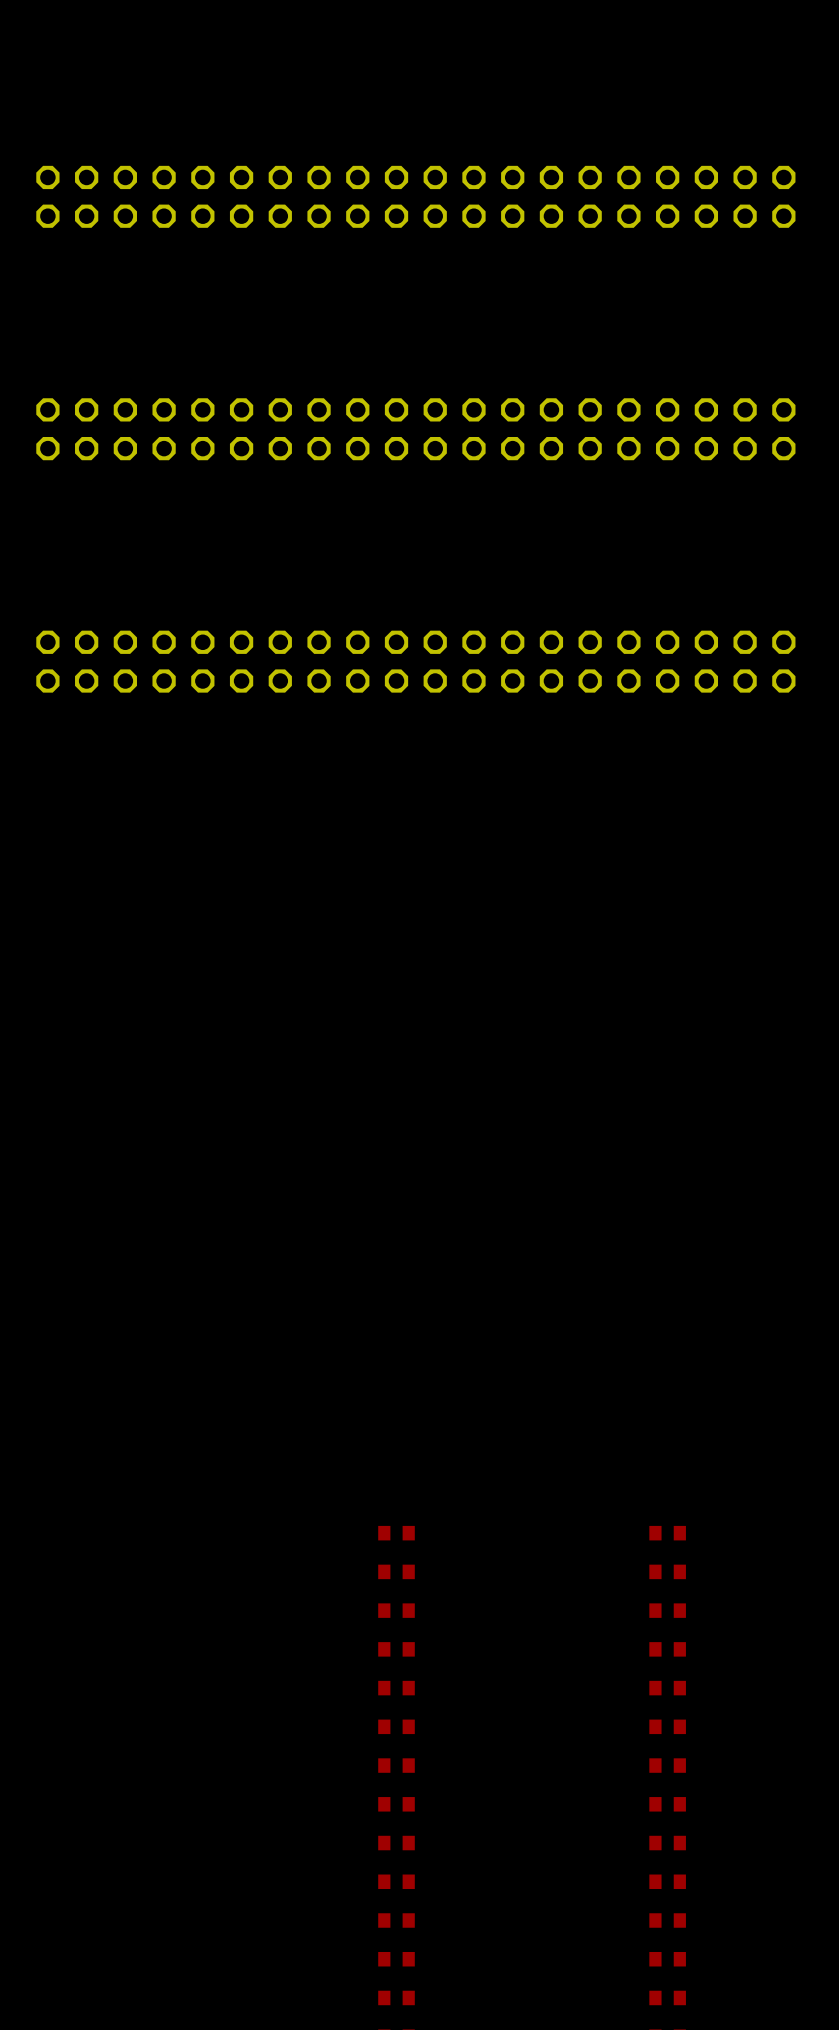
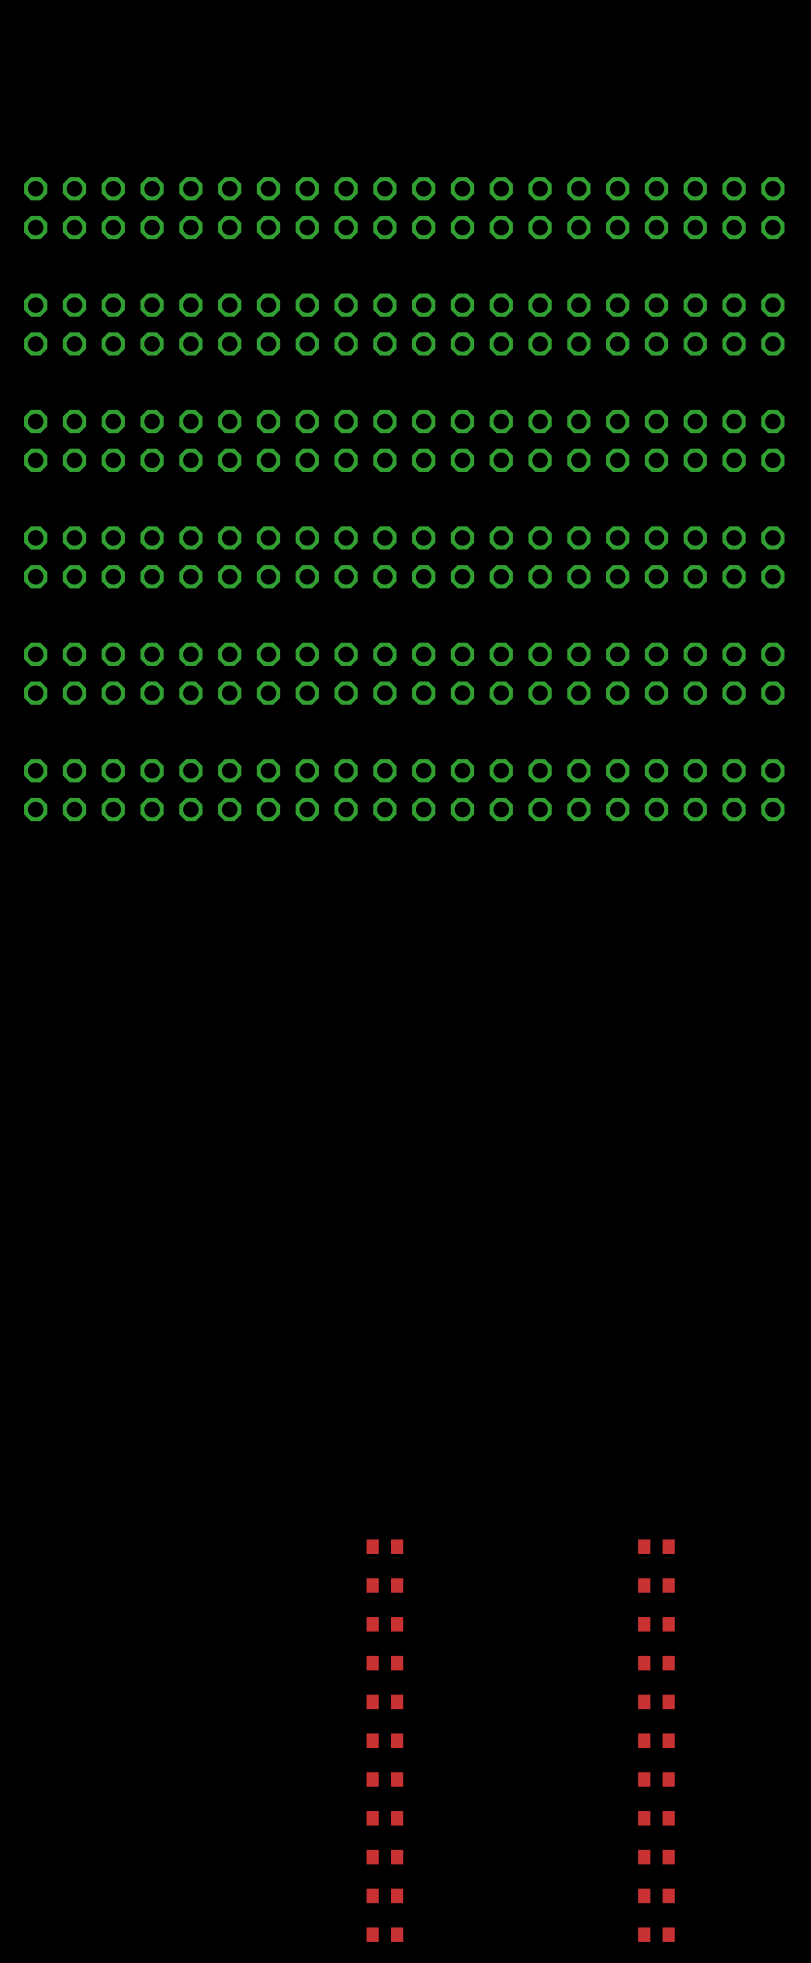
part: none -> (404, 324)
part: none -> (404, 557)
part: none -> (404, 790)

